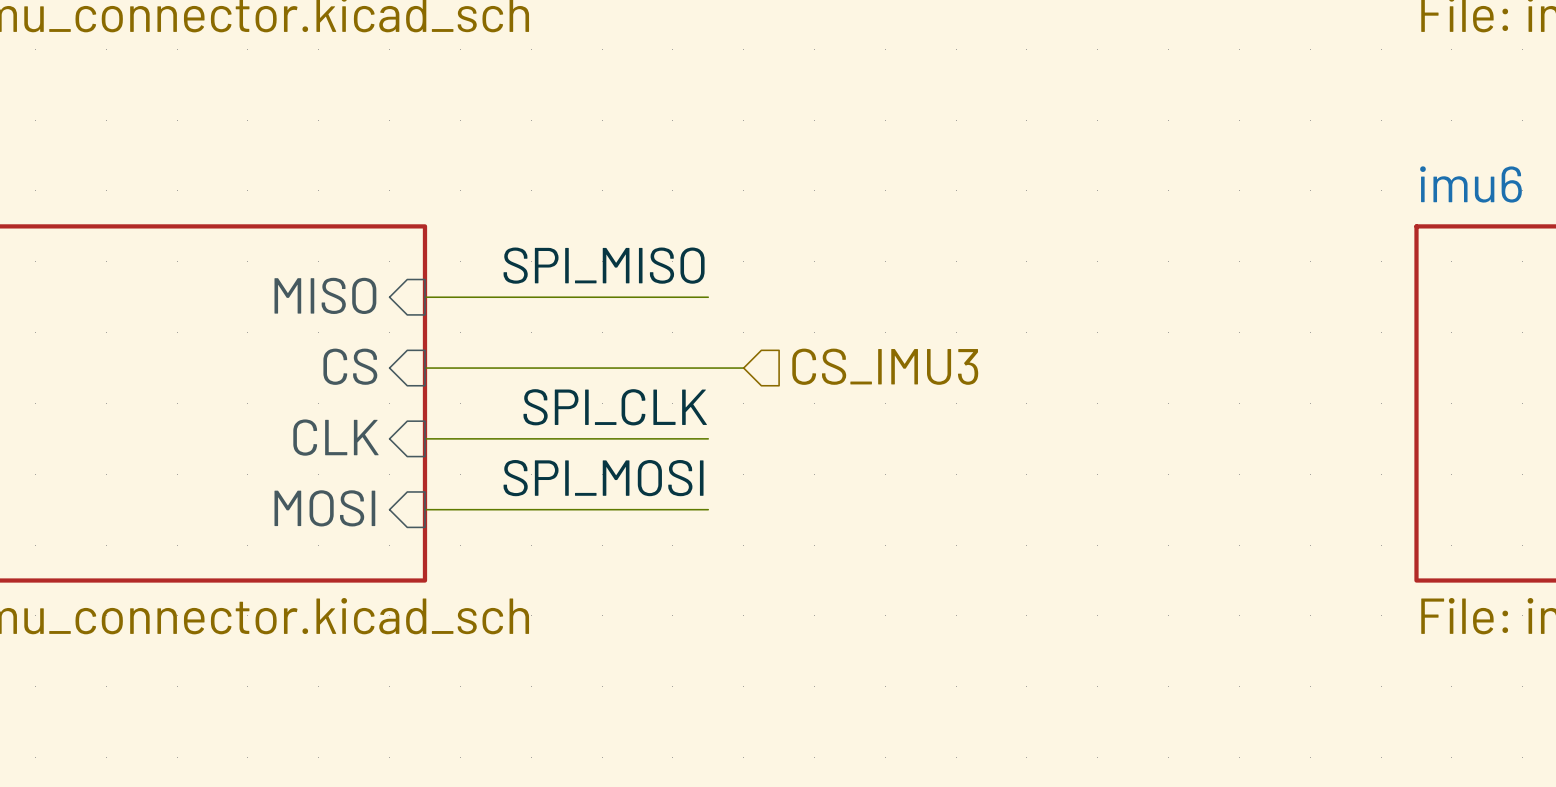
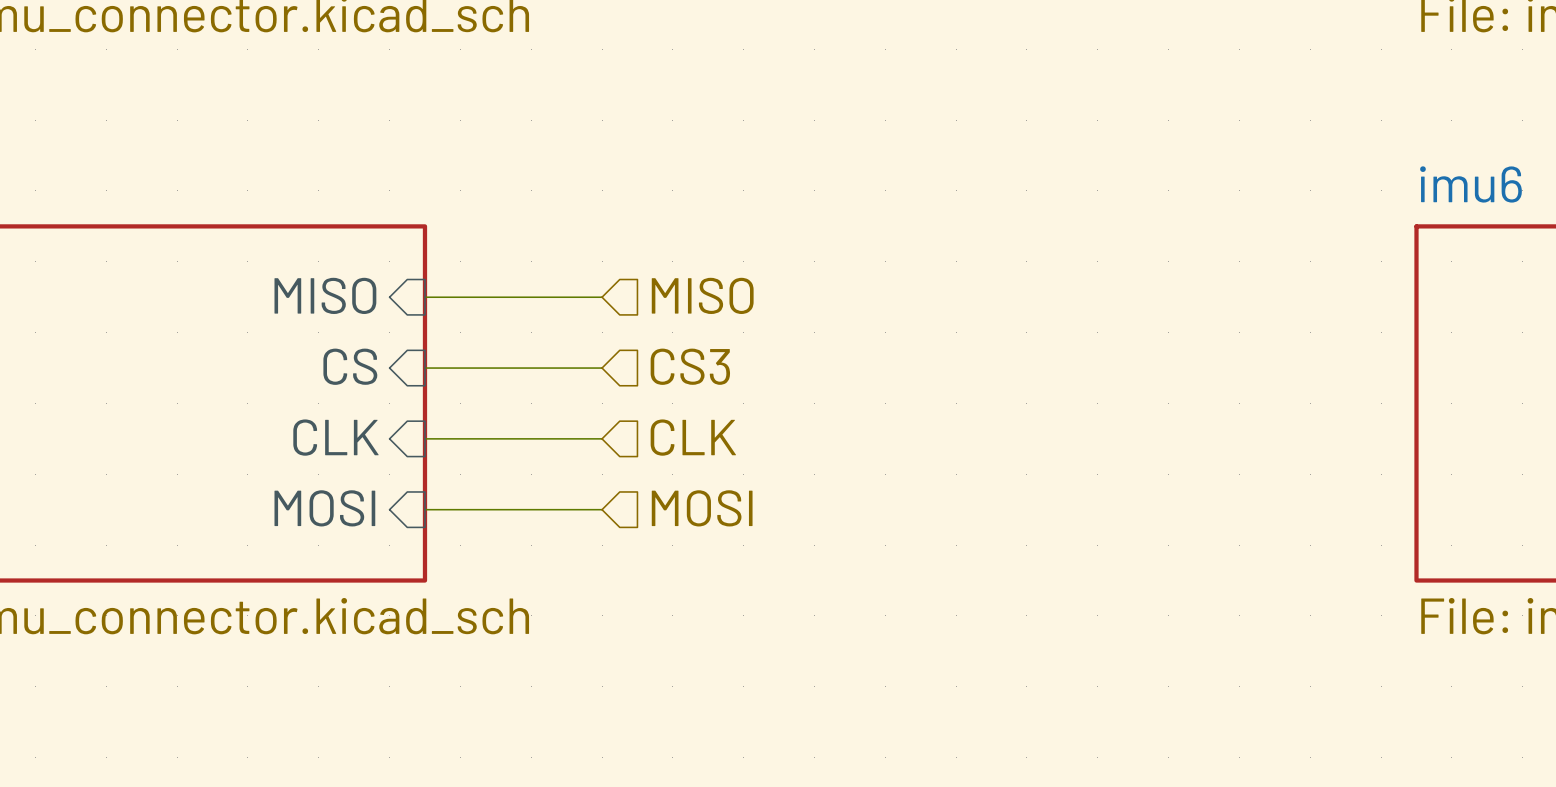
label: SPI_MISO (604, 265) -> none
hierarchical label: none -> MISO (702, 295)
wire: (602, 297) (708, 297) -> none
hierarchical label: none -> CS3 (690, 366)
hierarchical label: CS_IMU3 (885, 366) -> none
wire: (602, 368) (743, 368) -> none
label: SPI_CLK (615, 407) -> none
hierarchical label: none -> CLK (693, 437)
wire: (602, 438) (708, 438) -> none
label: SPI_MOSI (603, 478) -> none
hierarchical label: none -> MOSI (702, 508)
wire: (602, 509) (708, 509) -> none

